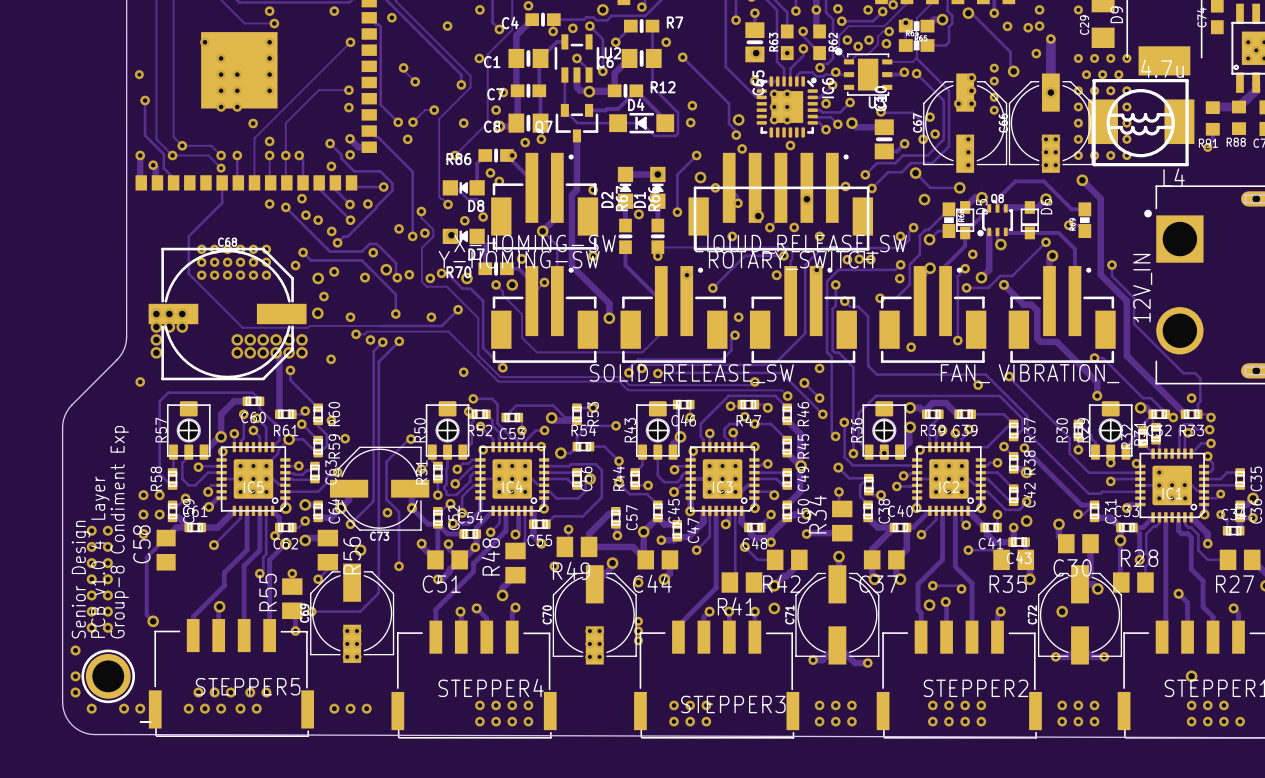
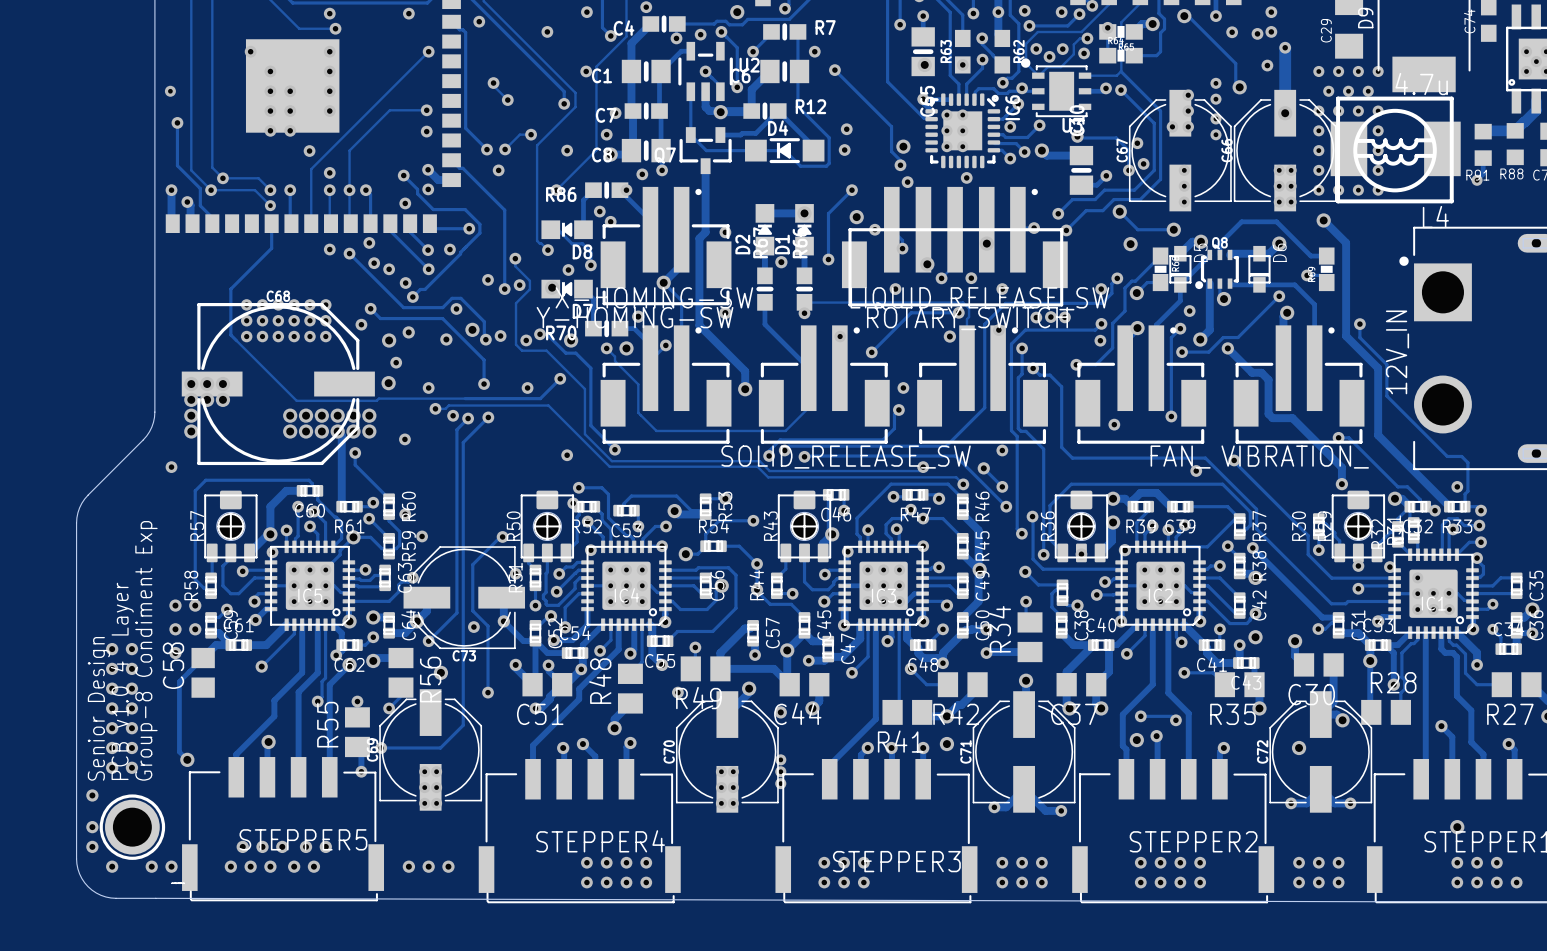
via: (1078, 9) -> none

